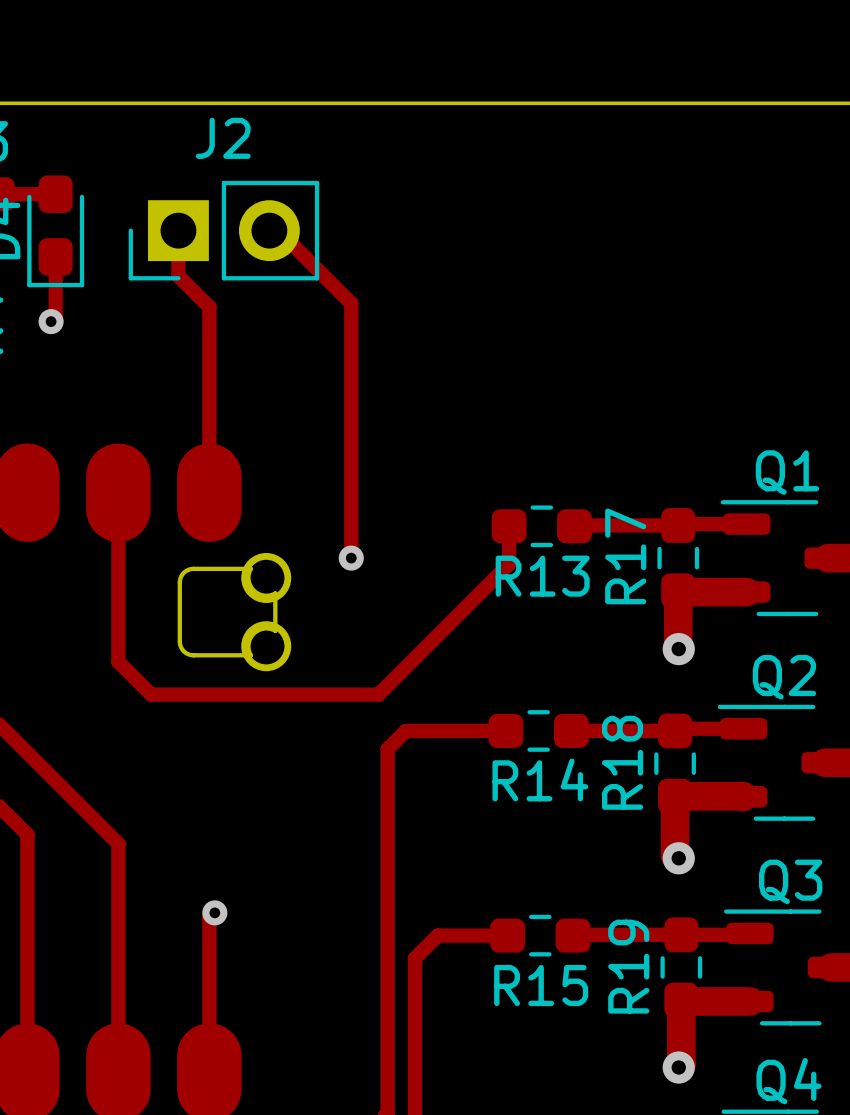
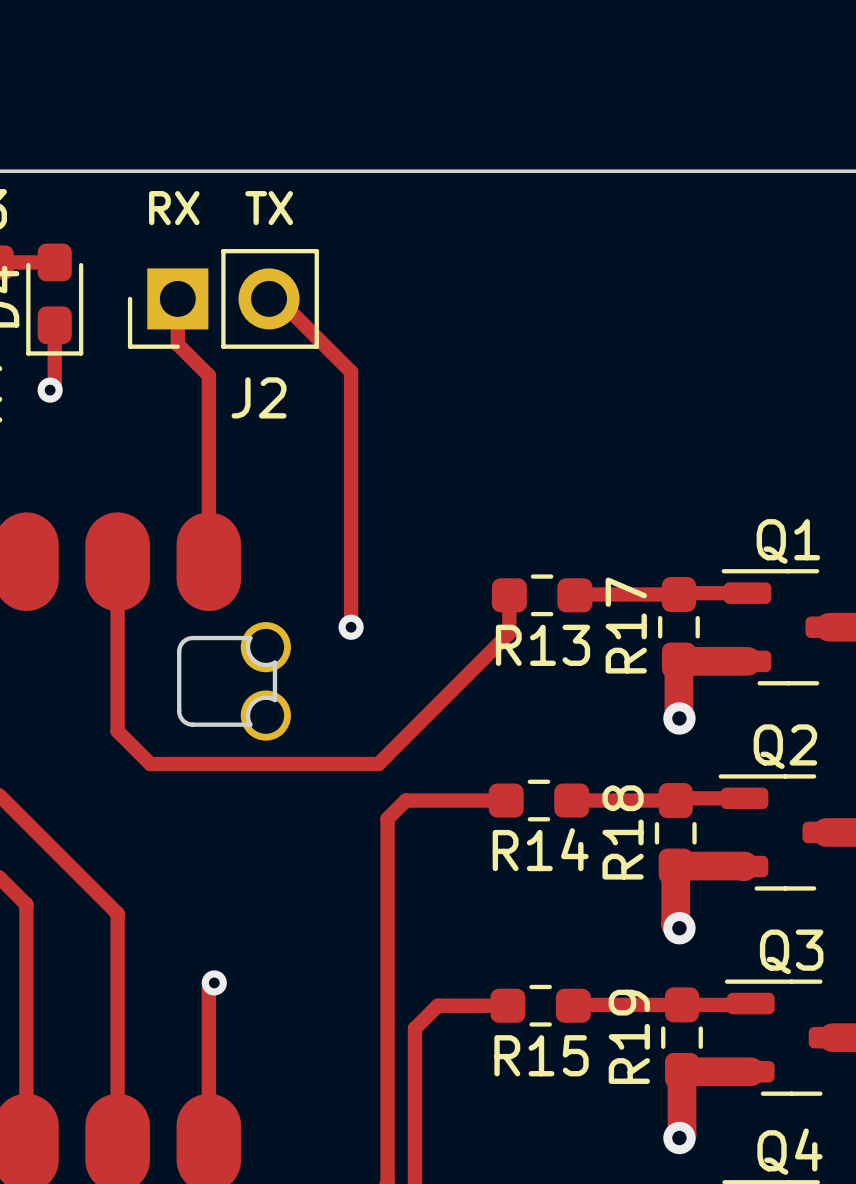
J2 name position: J2 (223, 138) -> J2 (259, 397)
text: none -> RX (174, 208)
text: none -> TX (269, 208)

